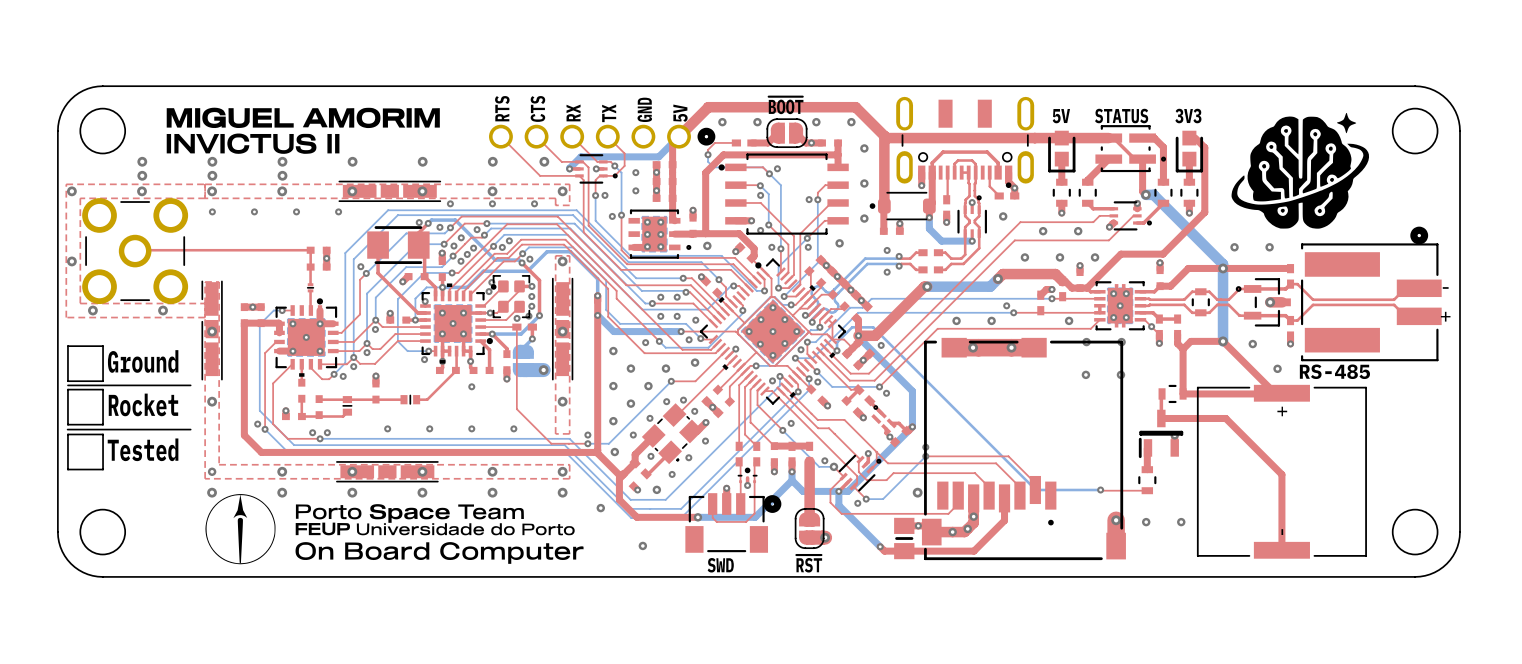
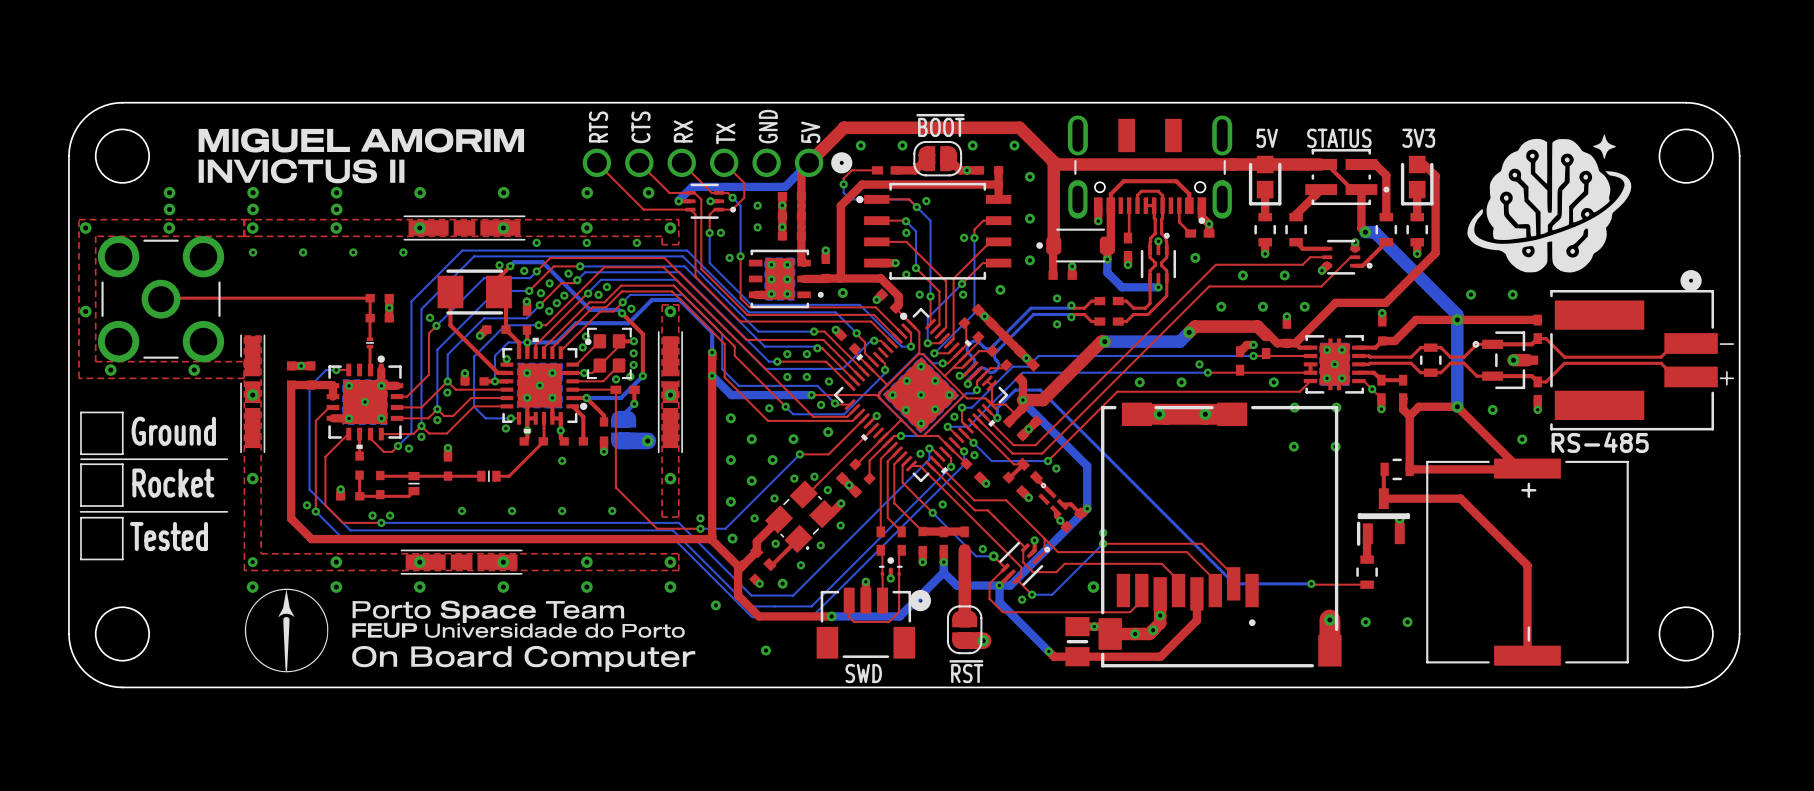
via: (837, 276) -> none
via: (850, 290) -> none
via: (881, 345) -> none

